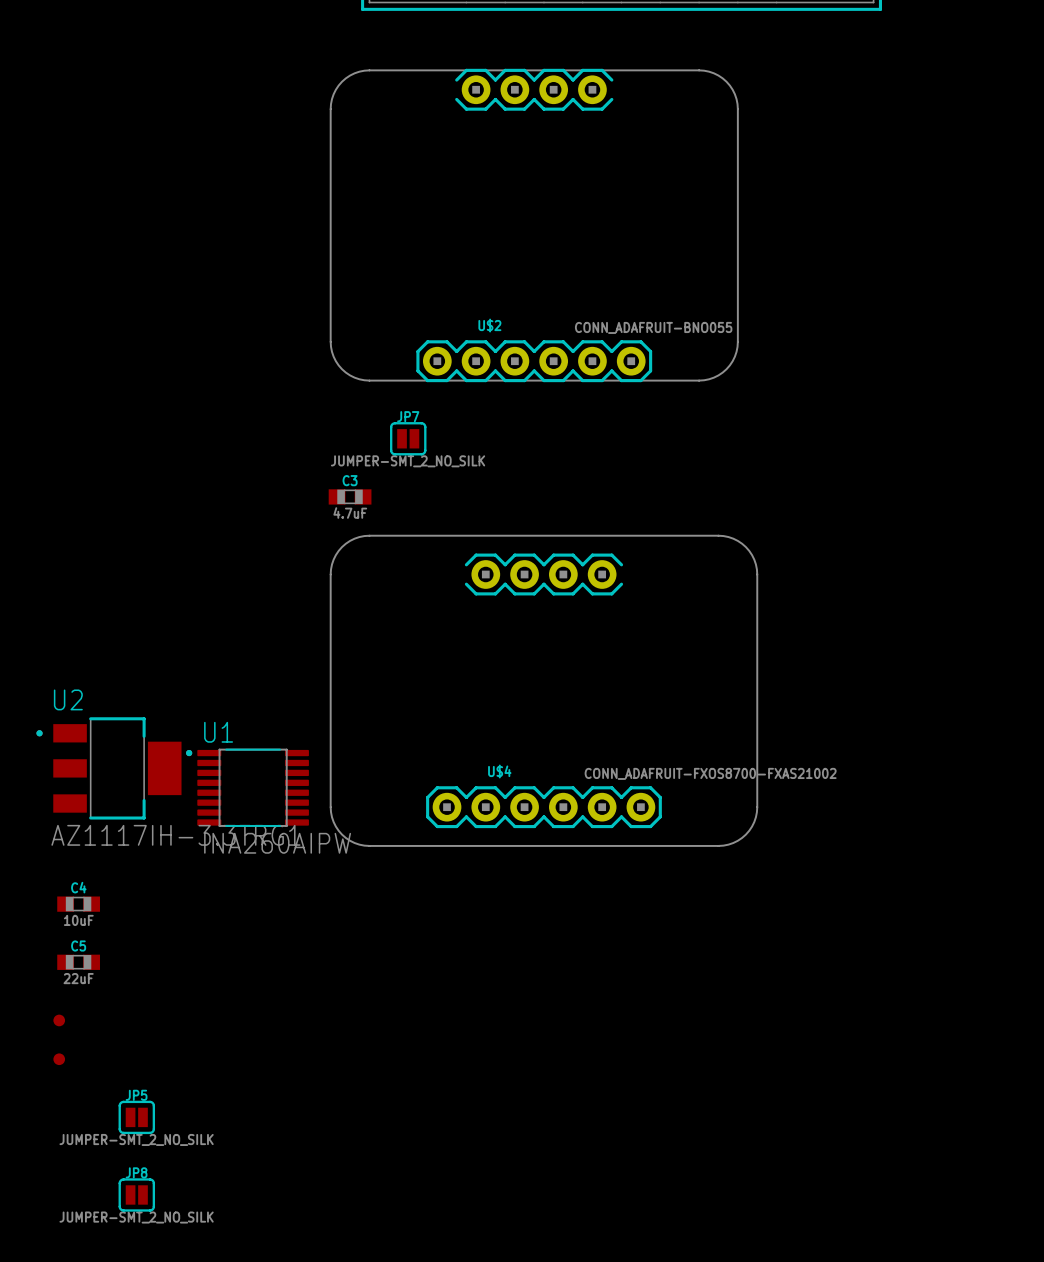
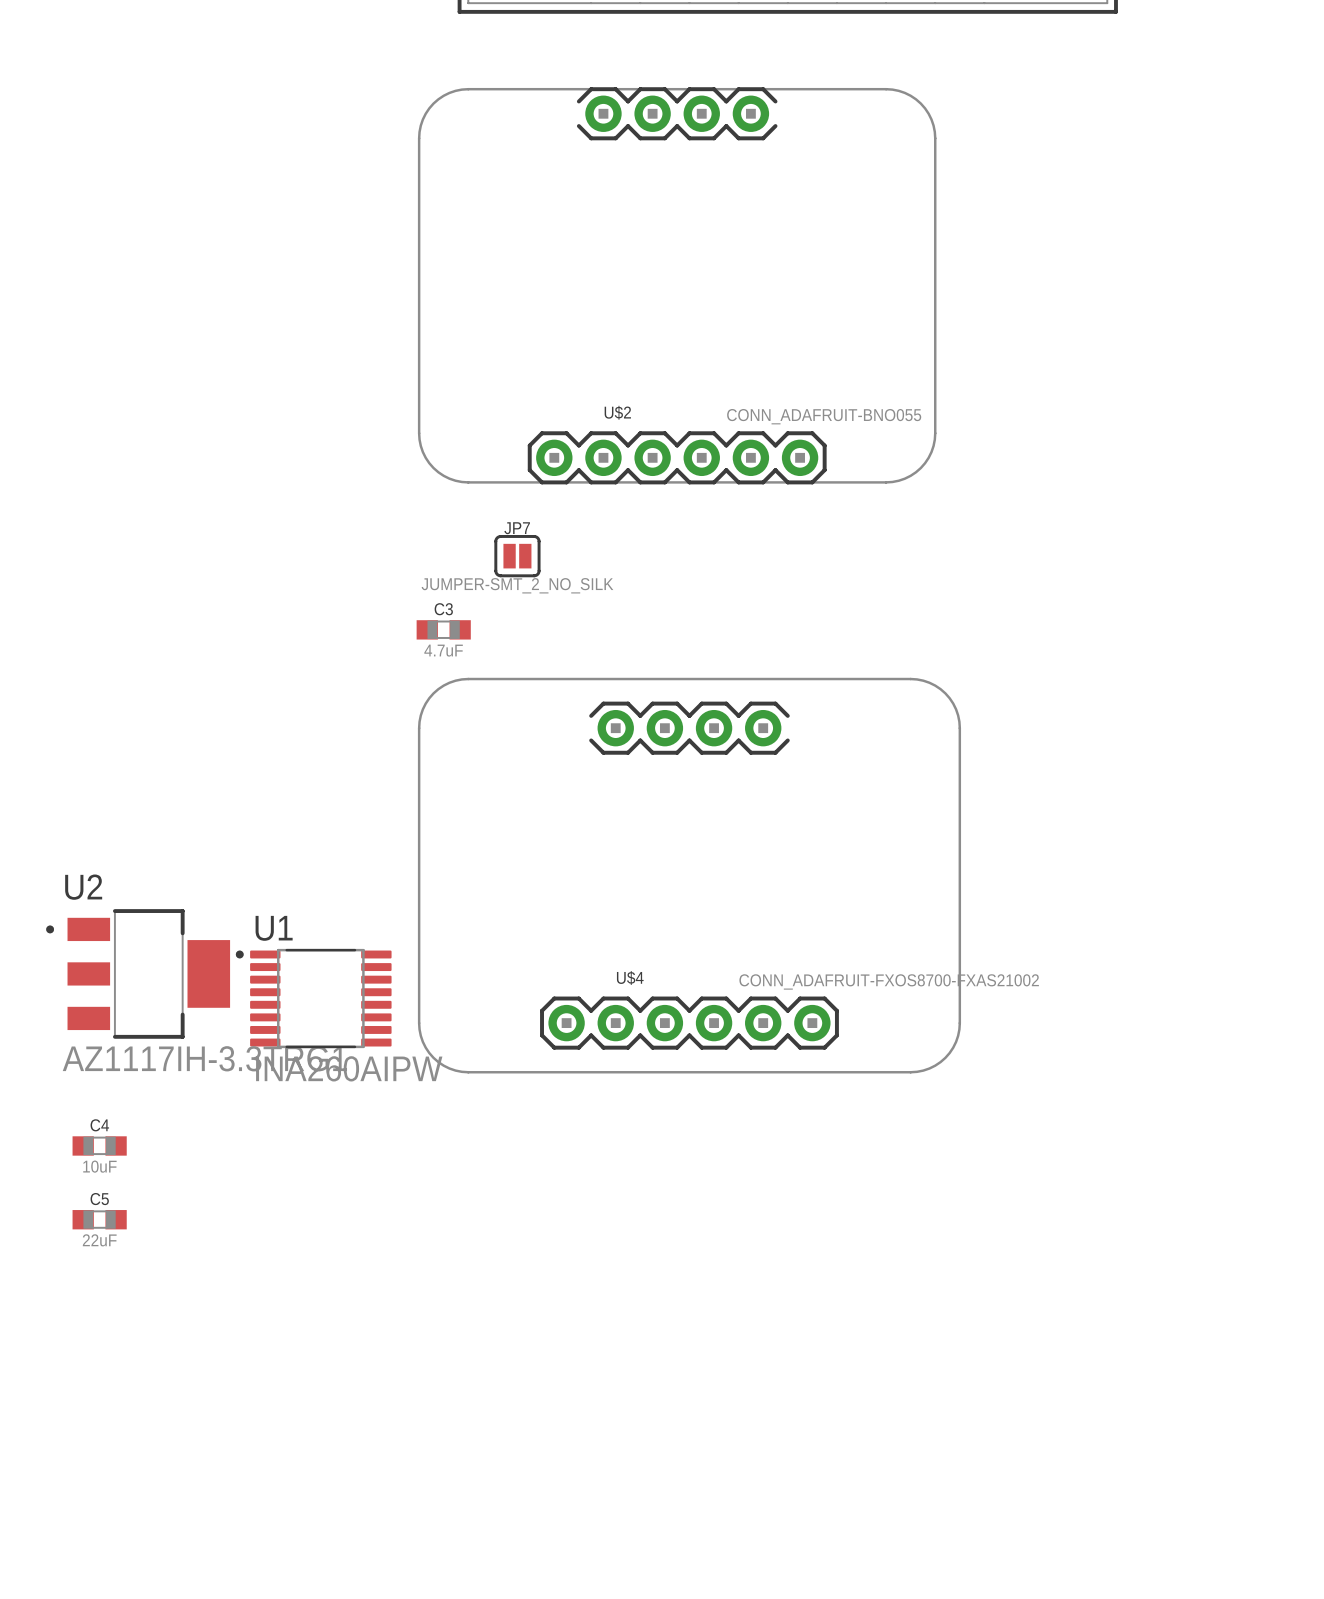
part: (59, 1020) -> none
part: (59, 1059) -> none
JP5: JUMPER-SMT_2_NO_SILK (136, 1117) -> none
JP8: JUMPER-SMT_2_NO_SILK (136, 1194) -> none

